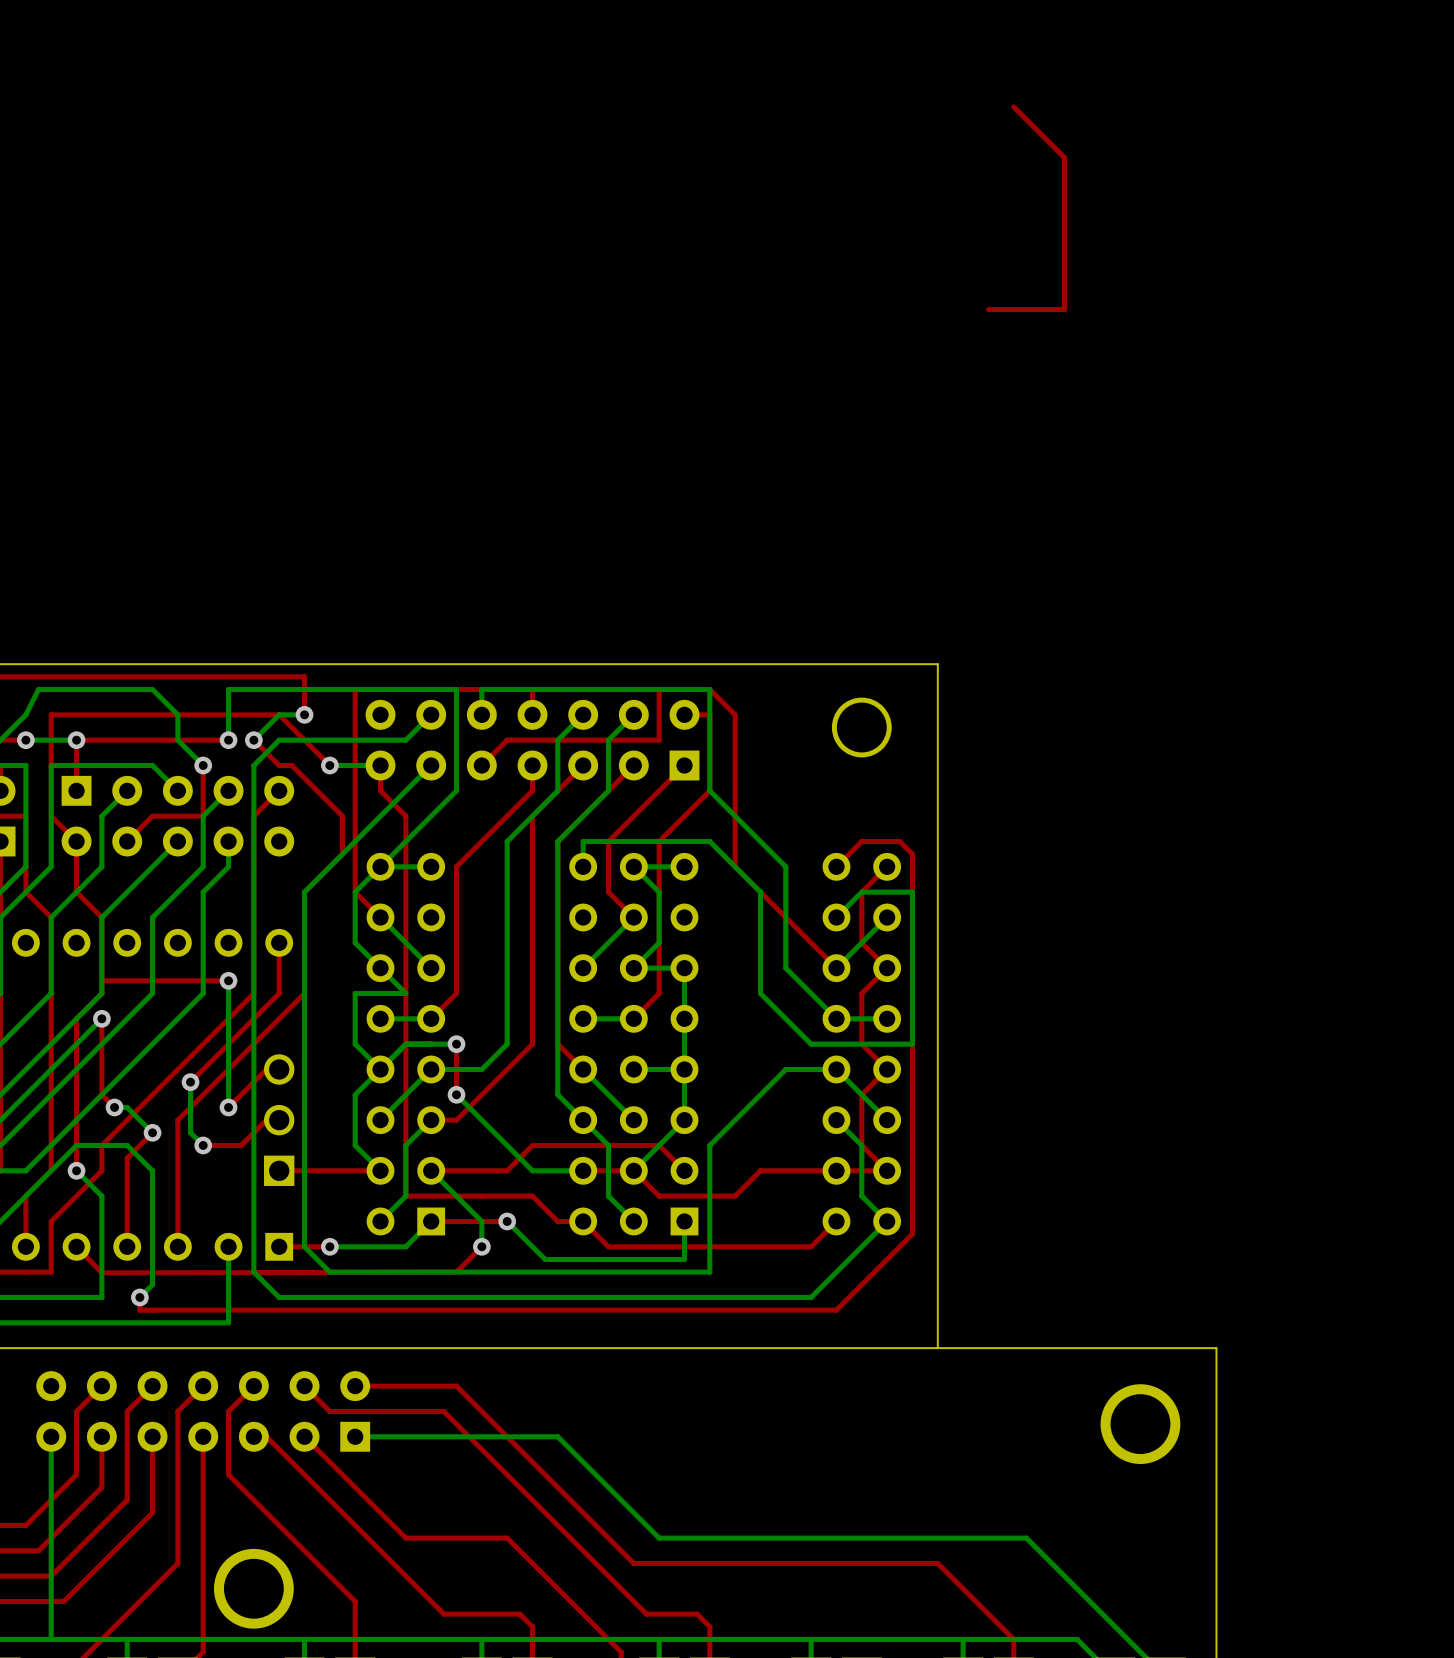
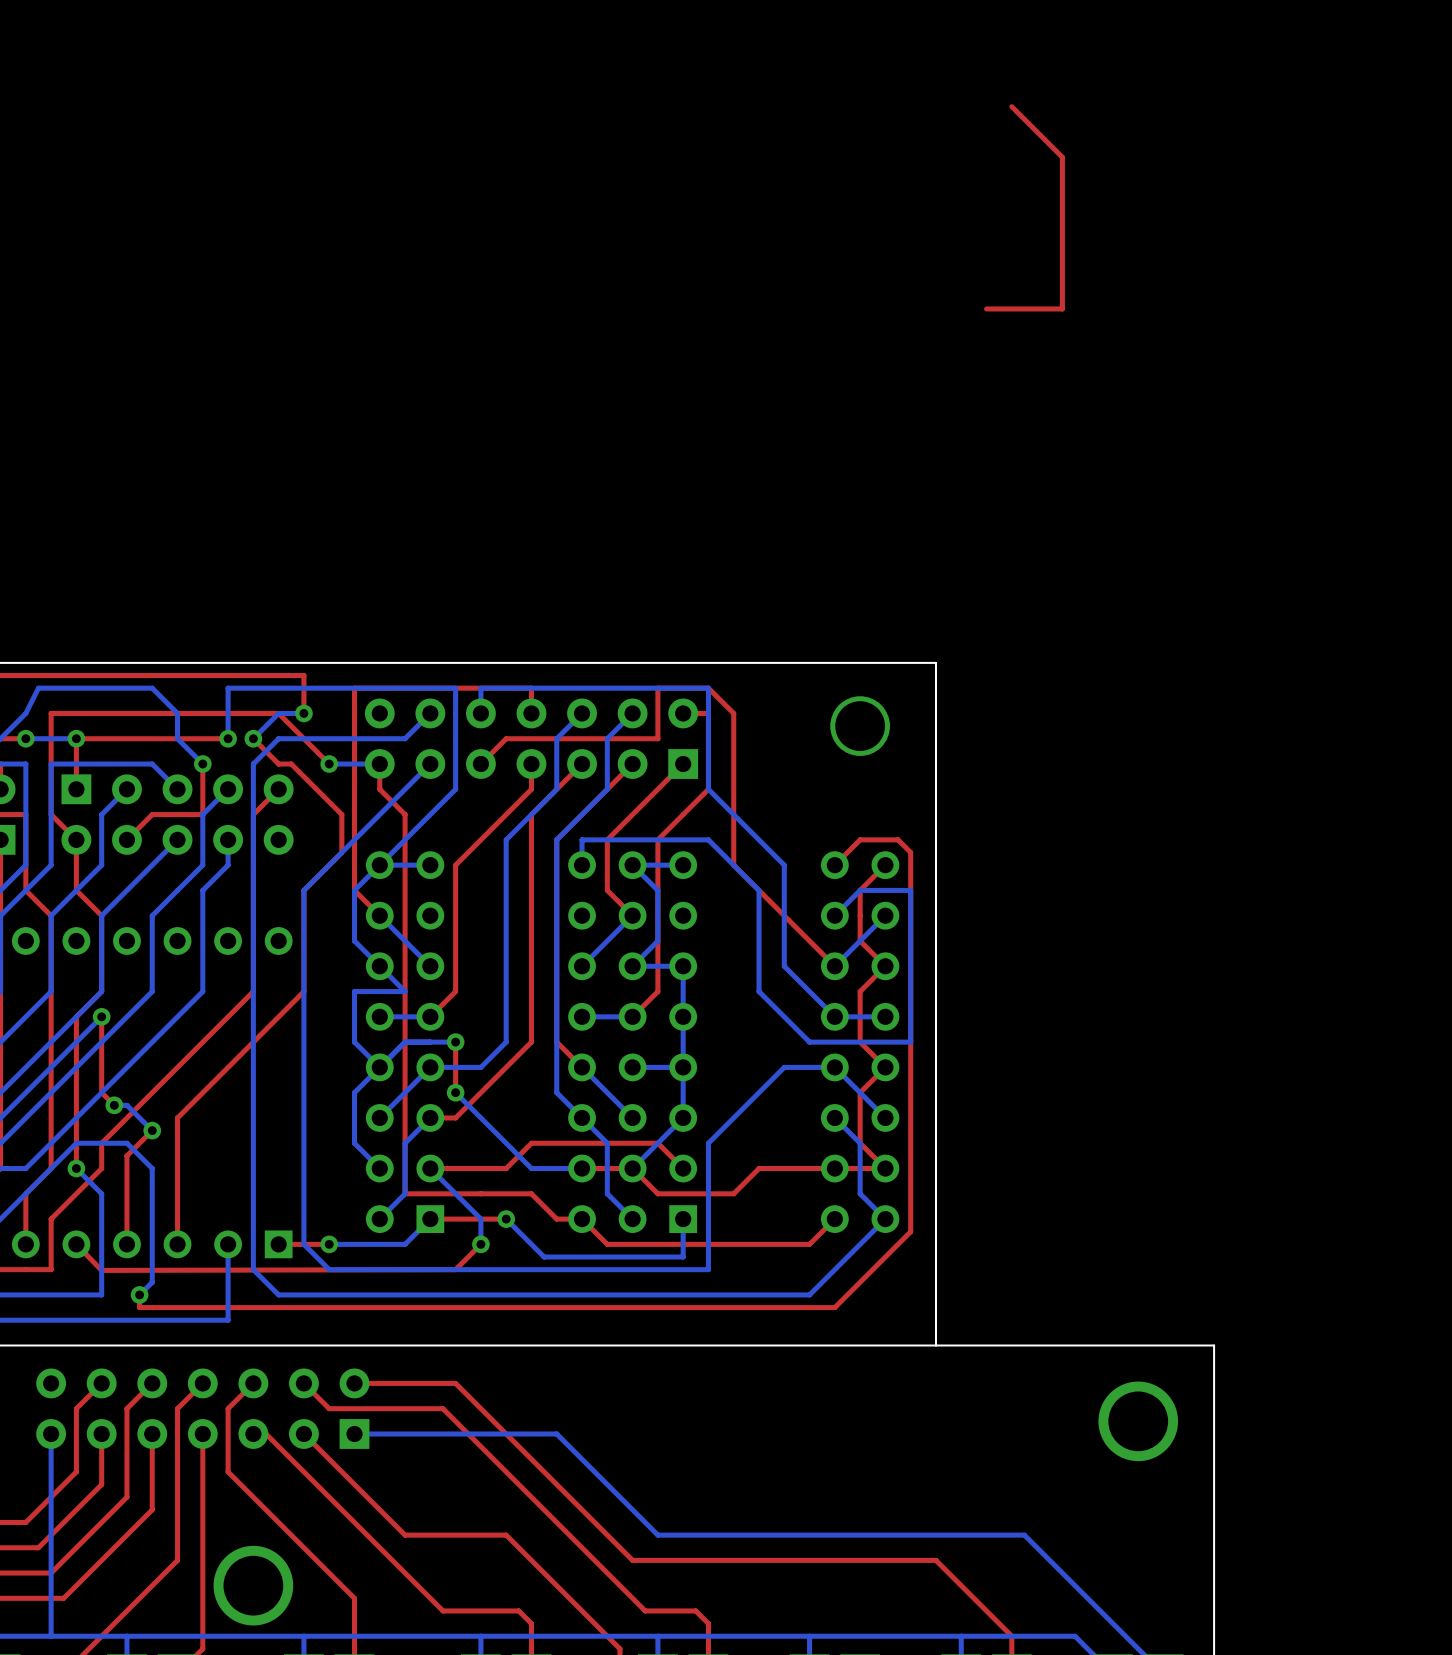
top track: (279, 942) (279, 993) (190, 1082) -> none
top track: (228, 980) (101, 980) -> none
bottom track: (228, 980) (228, 1107) -> none
via: (228, 980) -> none
top track: (279, 1069) (266, 1069) (228, 1107) -> none
bottom track: (190, 1082) (190, 1132) (203, 1145) -> none
via: (190, 1082) -> none
via: (228, 1107) -> none
top track: (279, 1120) (279, 1107) (241, 1145) (203, 1145) -> none
part: (279, 1120) -> none
via: (203, 1145) -> none
top track: (380, 1170) (279, 1170) -> none

